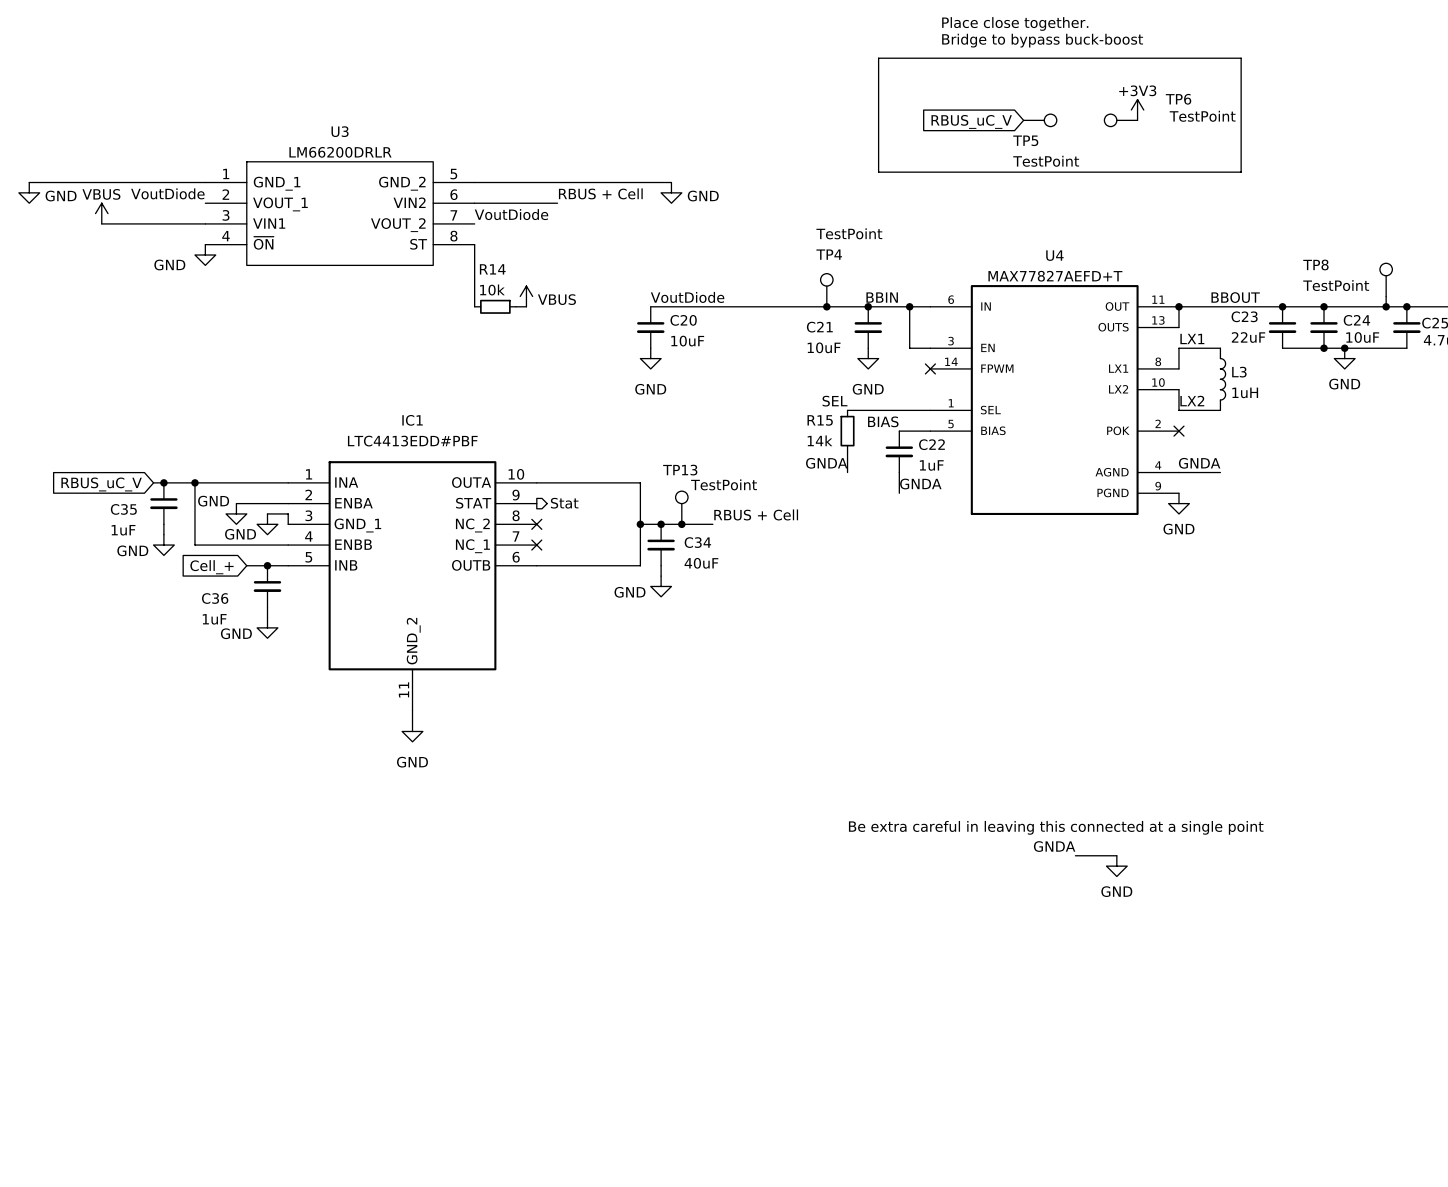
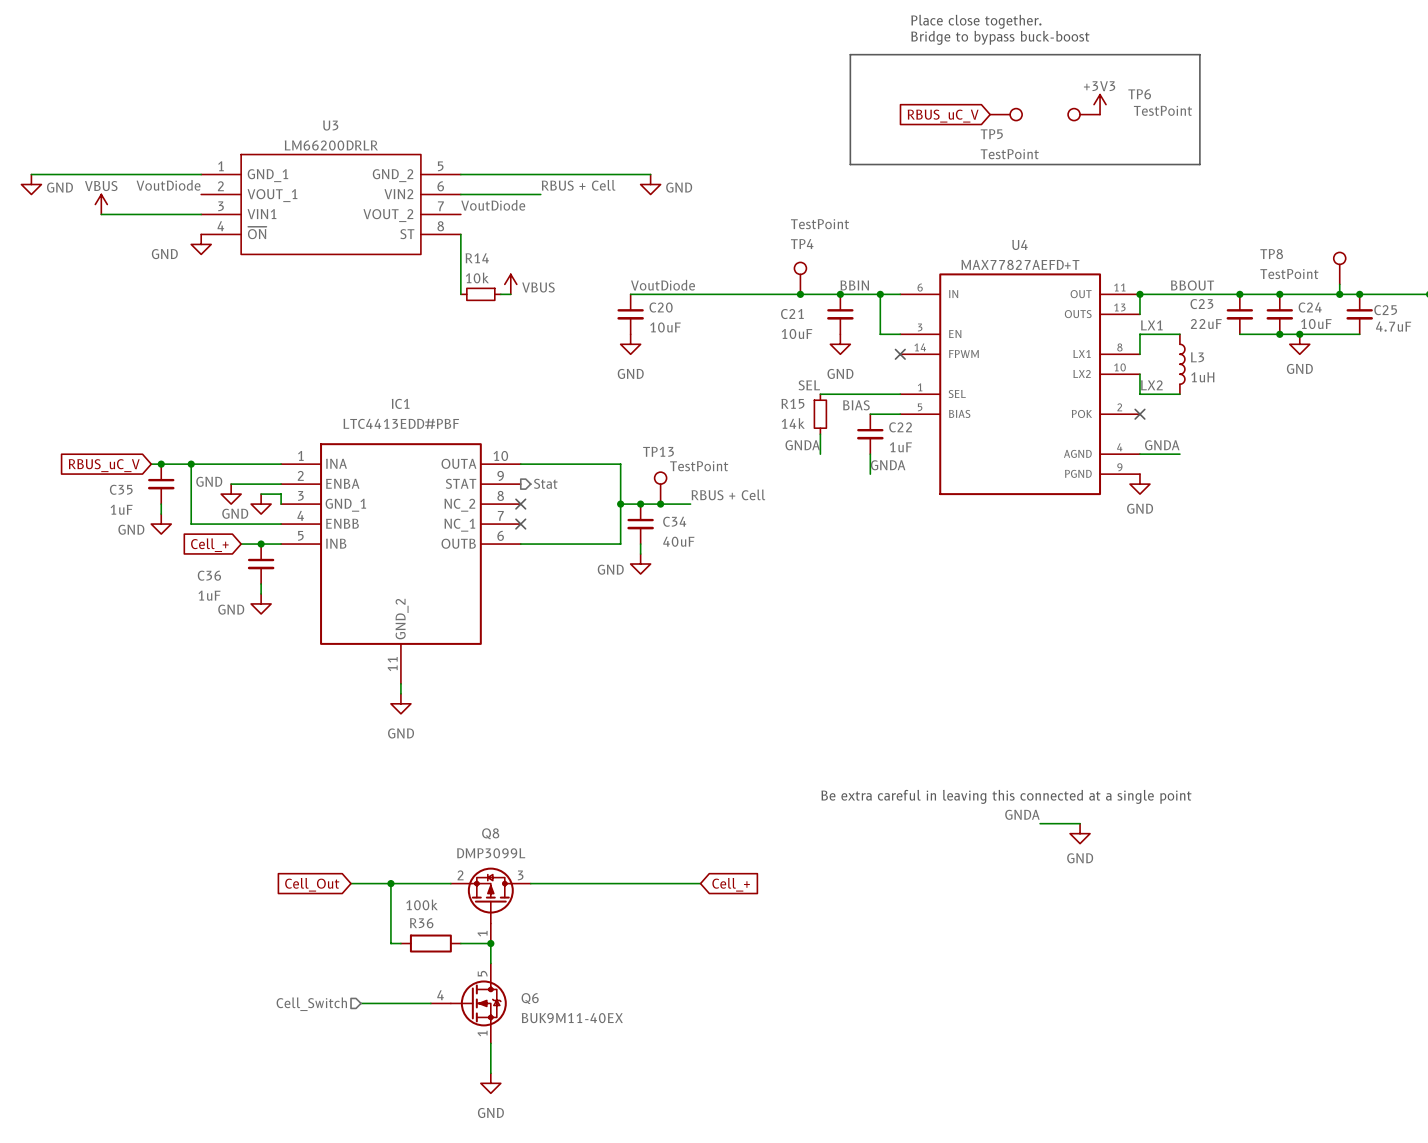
wire: none -> (351, 883) (450, 883)
wire: none -> (390, 883) (390, 943) (400, 943)
junction: none -> (390, 883)
wire: none -> (530, 883) (700, 883)
global label: none -> Cell_Out (312, 884)
global label: none -> Cell_+ (731, 884)
Q8: none -> DMP3099L (490, 905)
R36: none -> 100k (430, 943)
wire: none -> (460, 943) (490, 943) (490, 963)
junction: none -> (490, 943)
wire: none -> (360, 1003) (430, 1003)
Q6: none -> BUK9M11-40EX (468, 1003)
hierarchical label: none -> Cell_Switch (311, 1004)
wire: none -> (490, 1043) (490, 1073)
power symbol: none -> GND (490, 1083)

